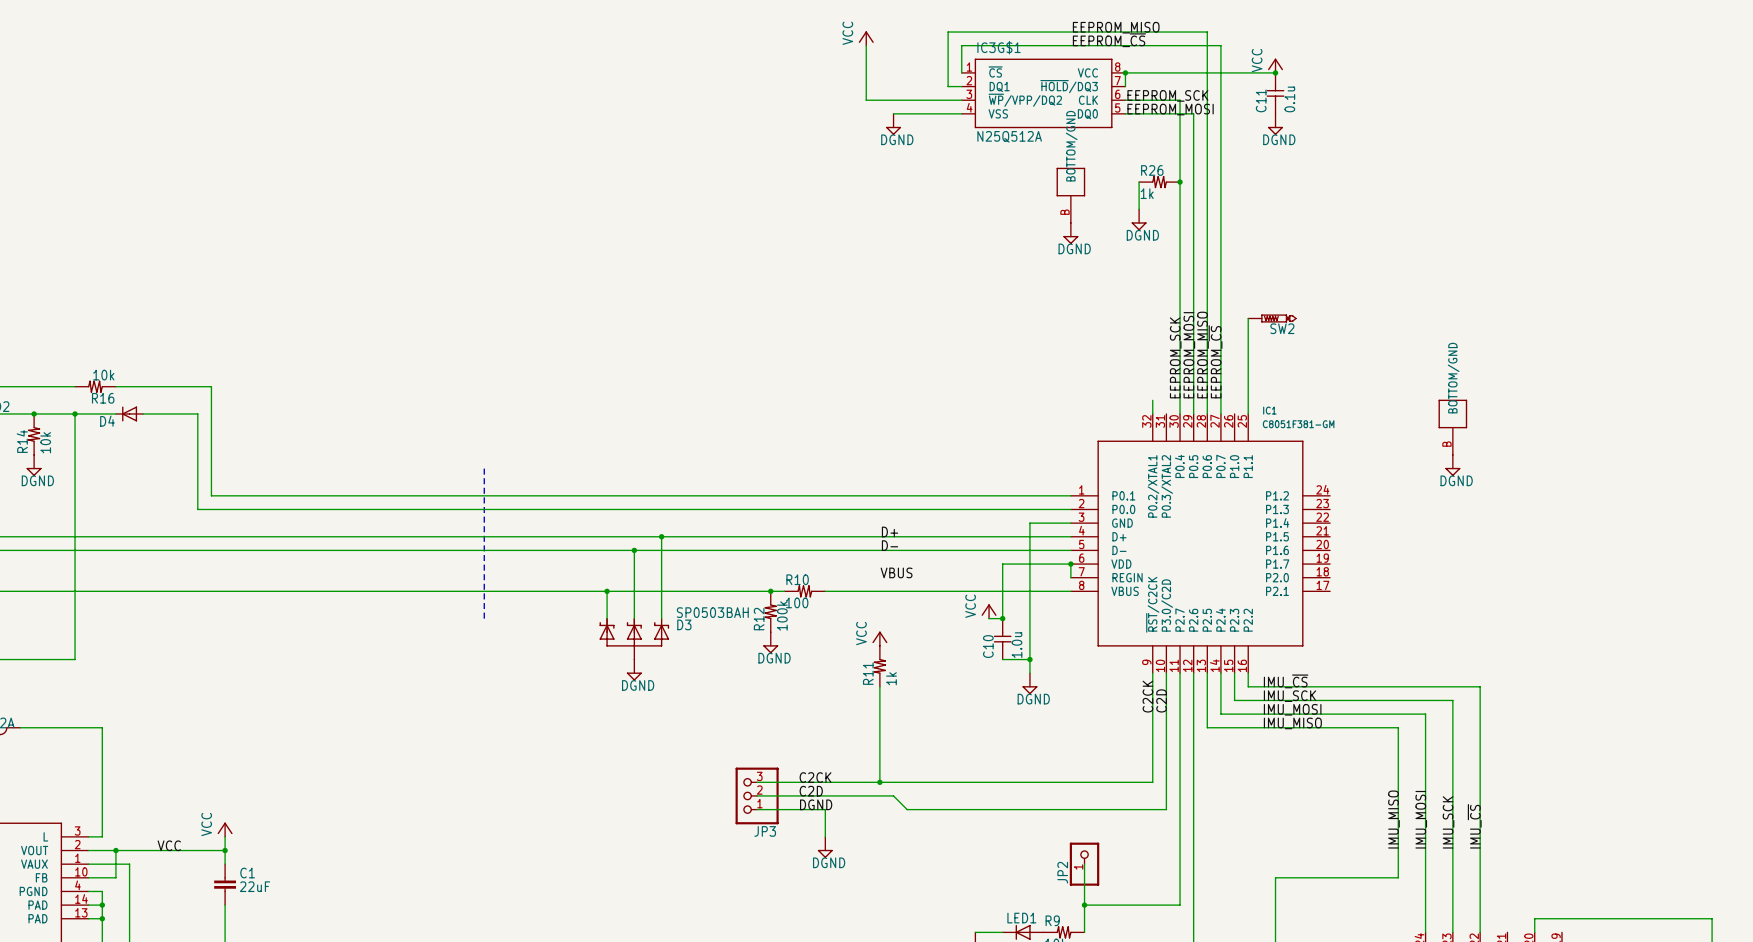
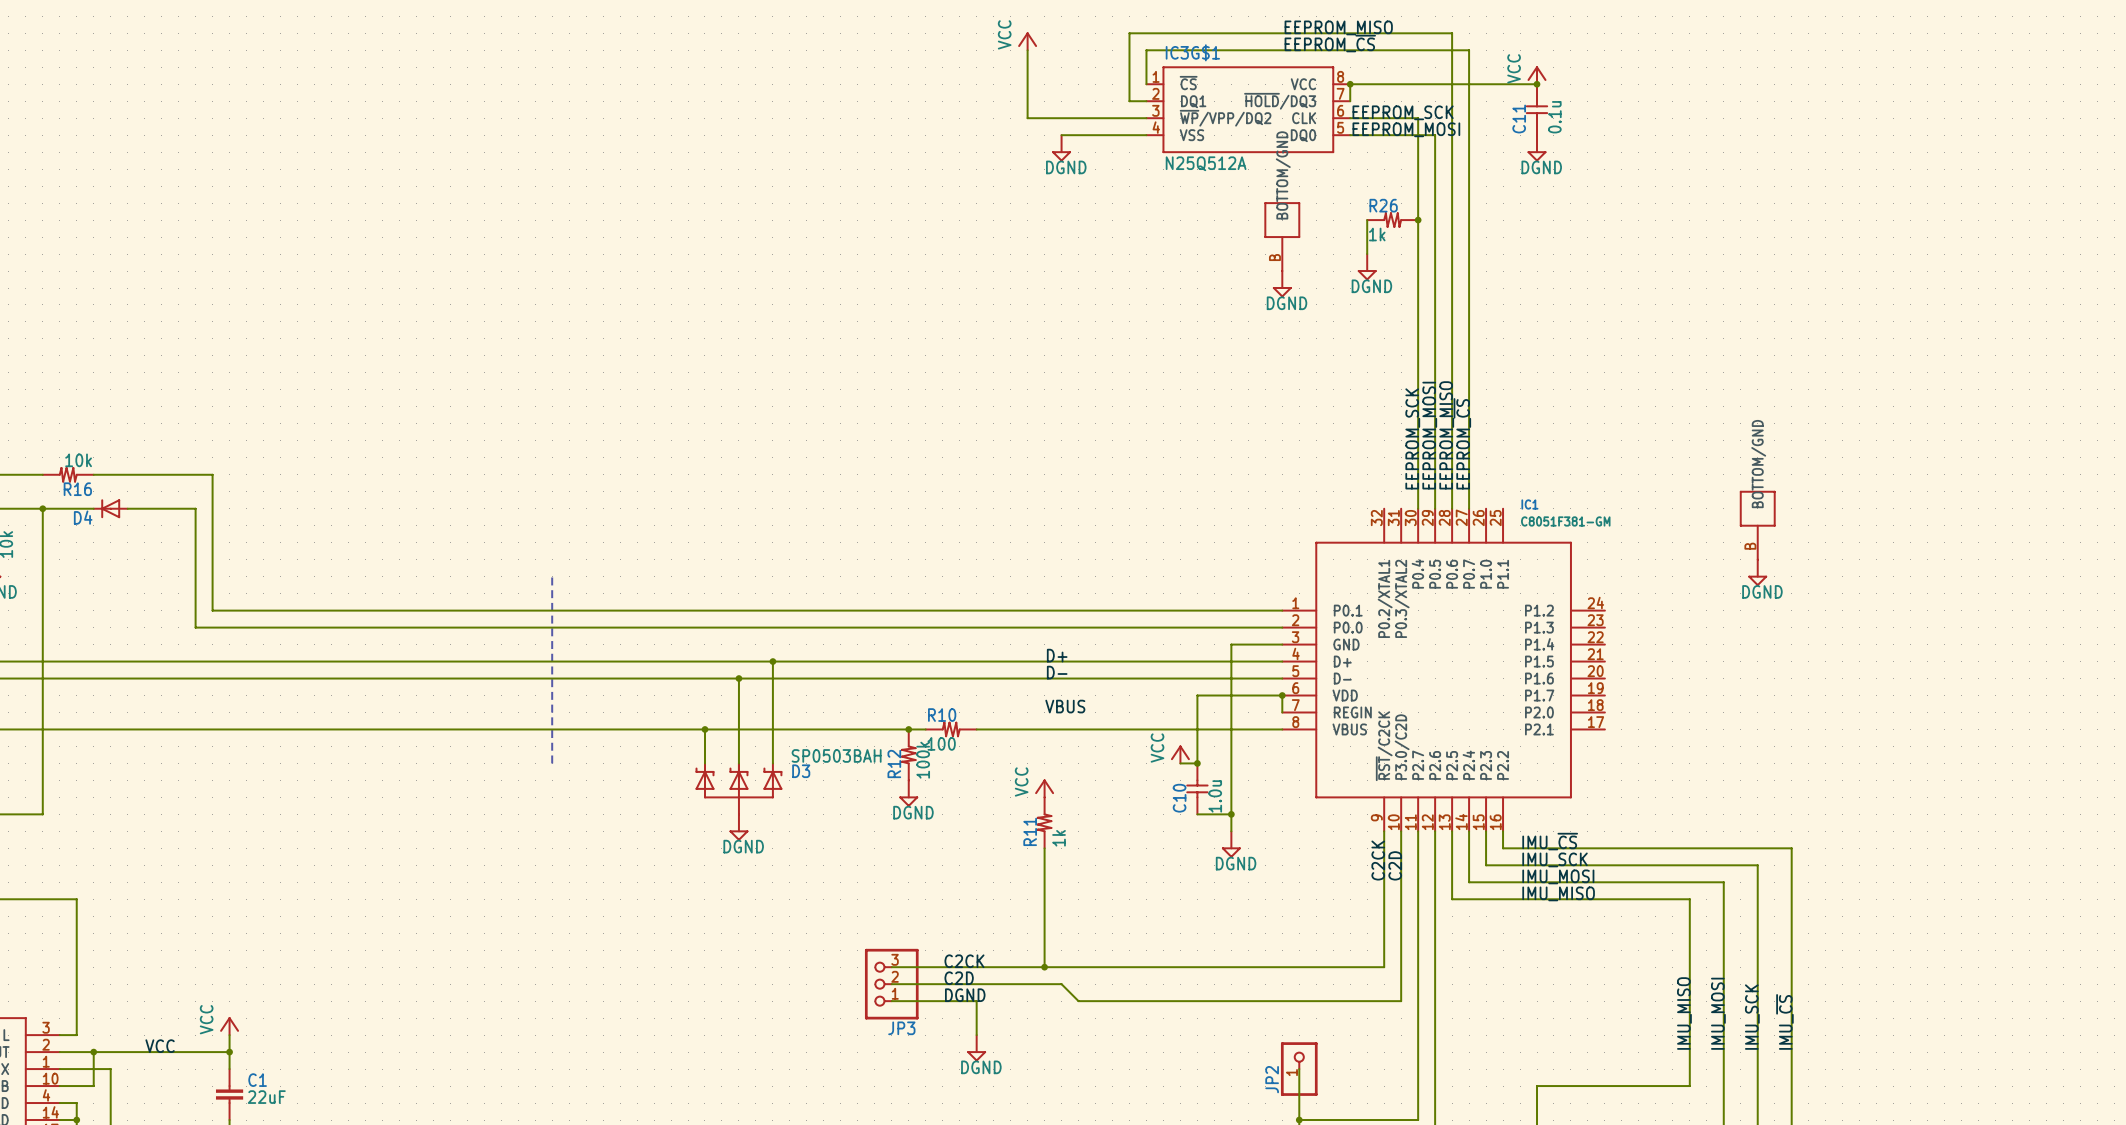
wire: (1248, 318) (1248, 413) -> none
SW2: (1272, 318) -> none
wire: (1152, 400) (1152, 413) -> none

